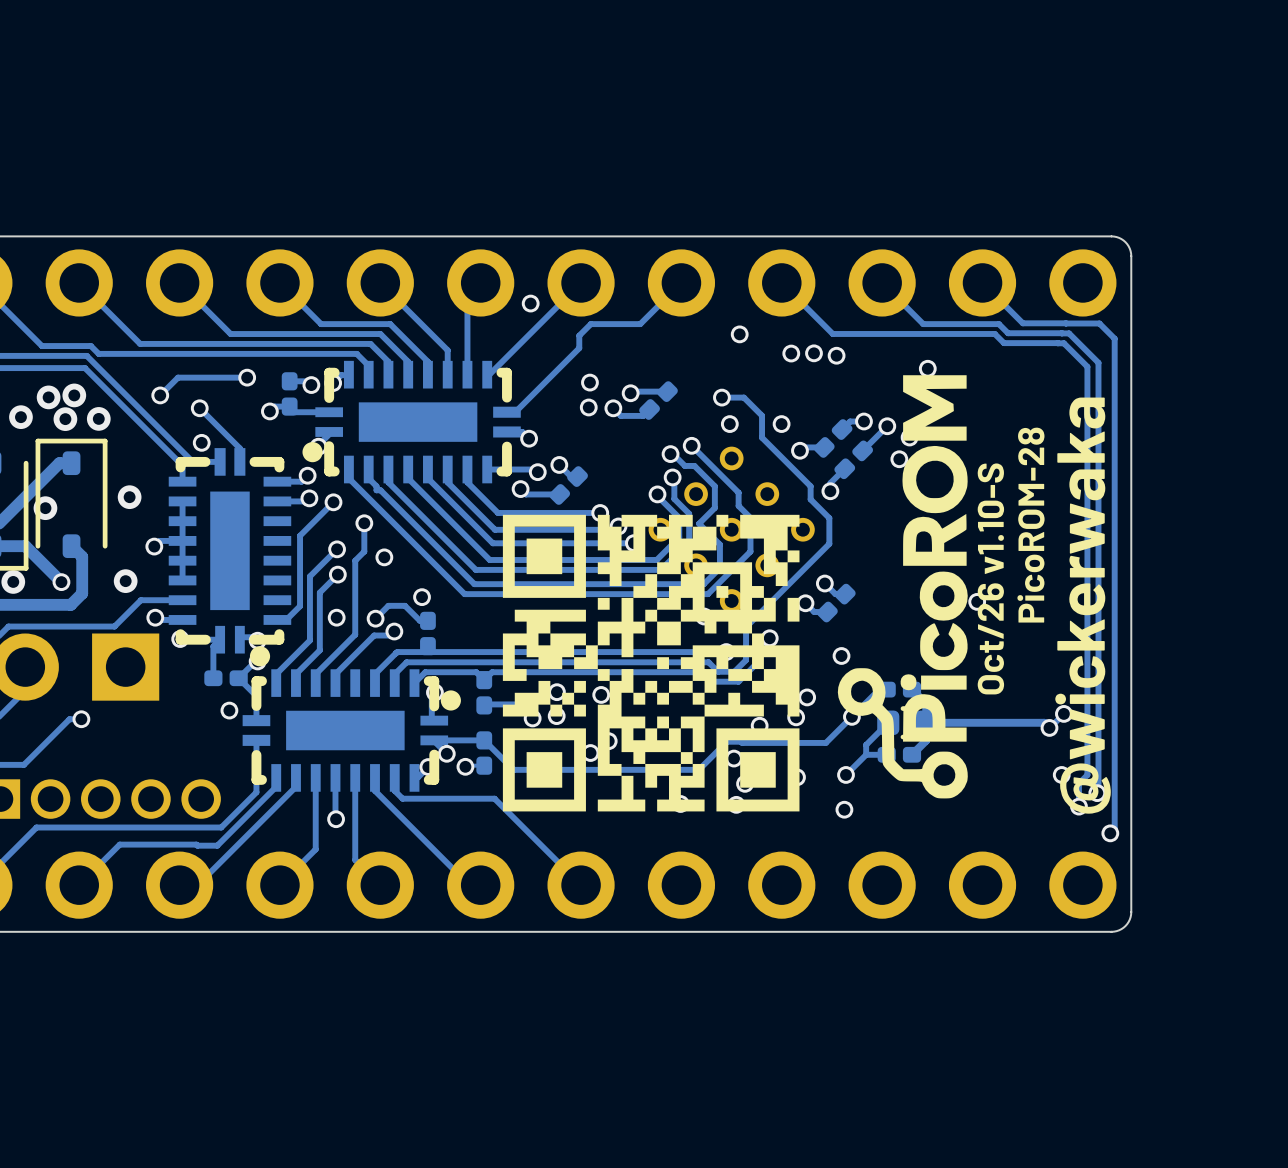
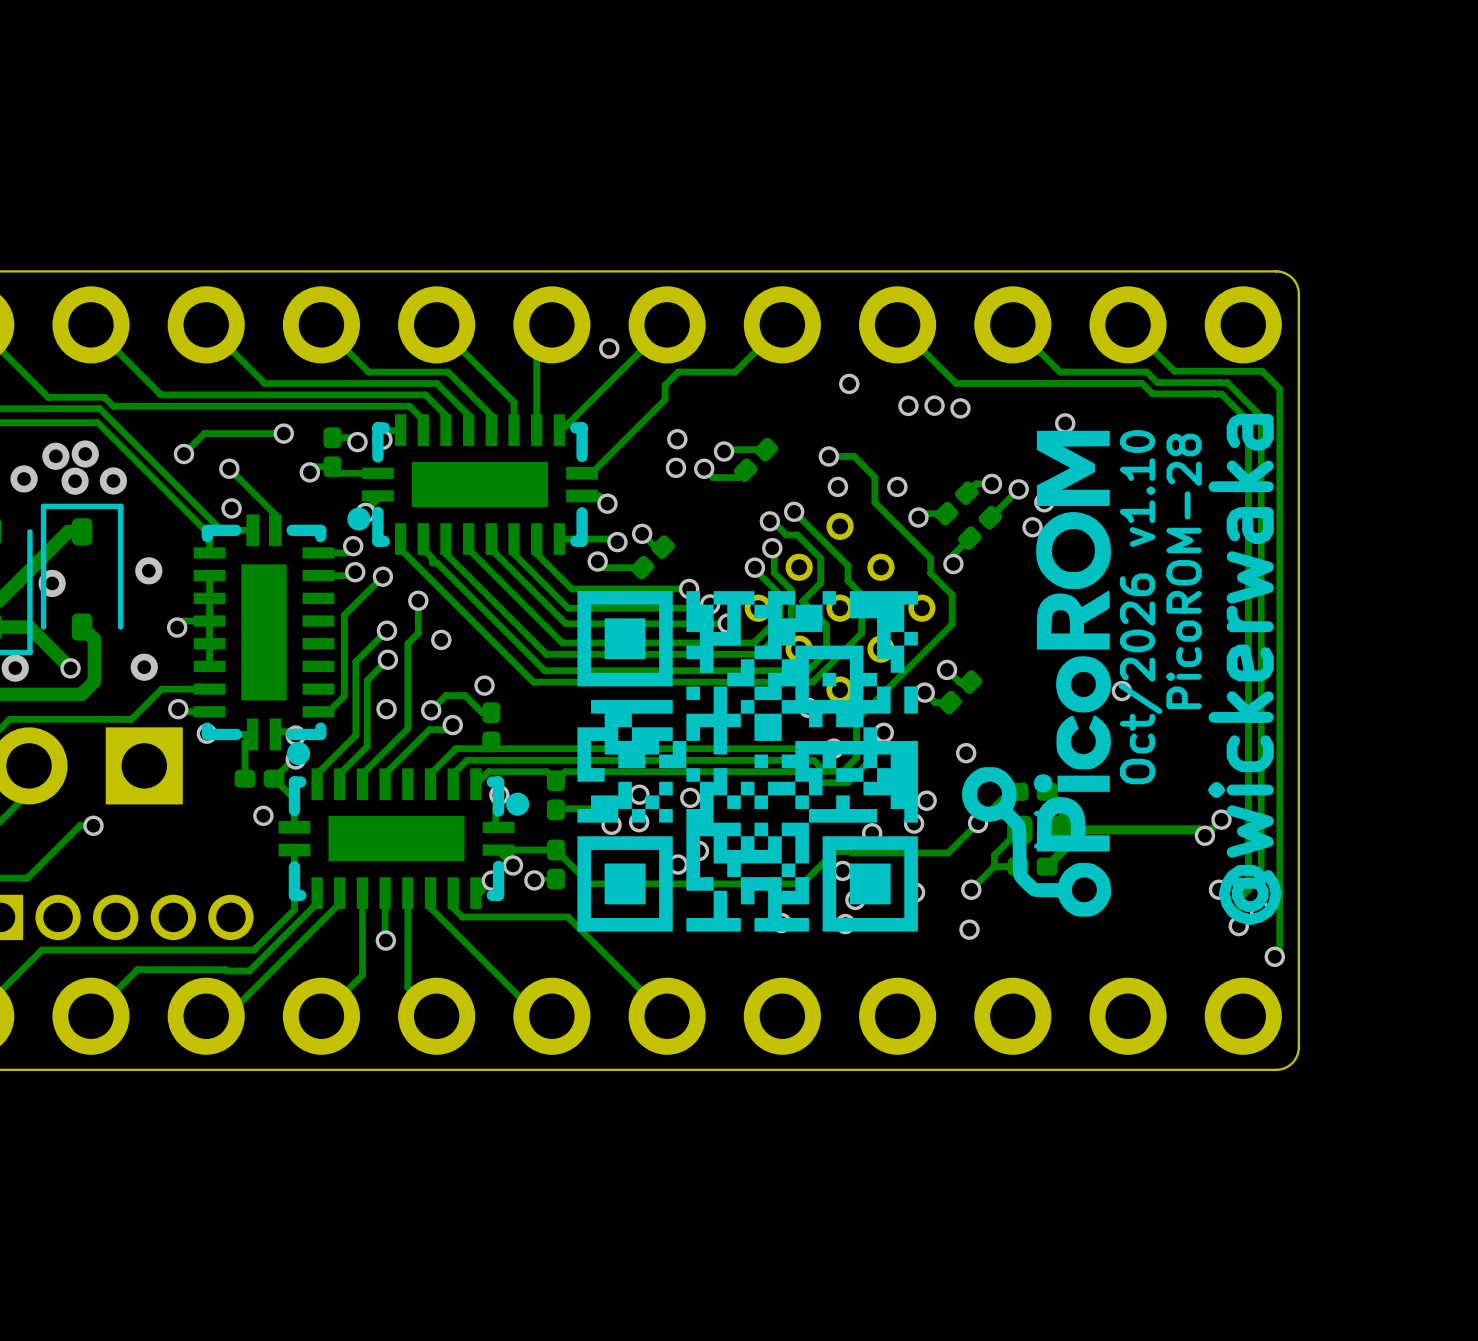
text: Oct/26 v1.10-S (990, 578) -> Oct/2026 v1.10 (1140, 607)

